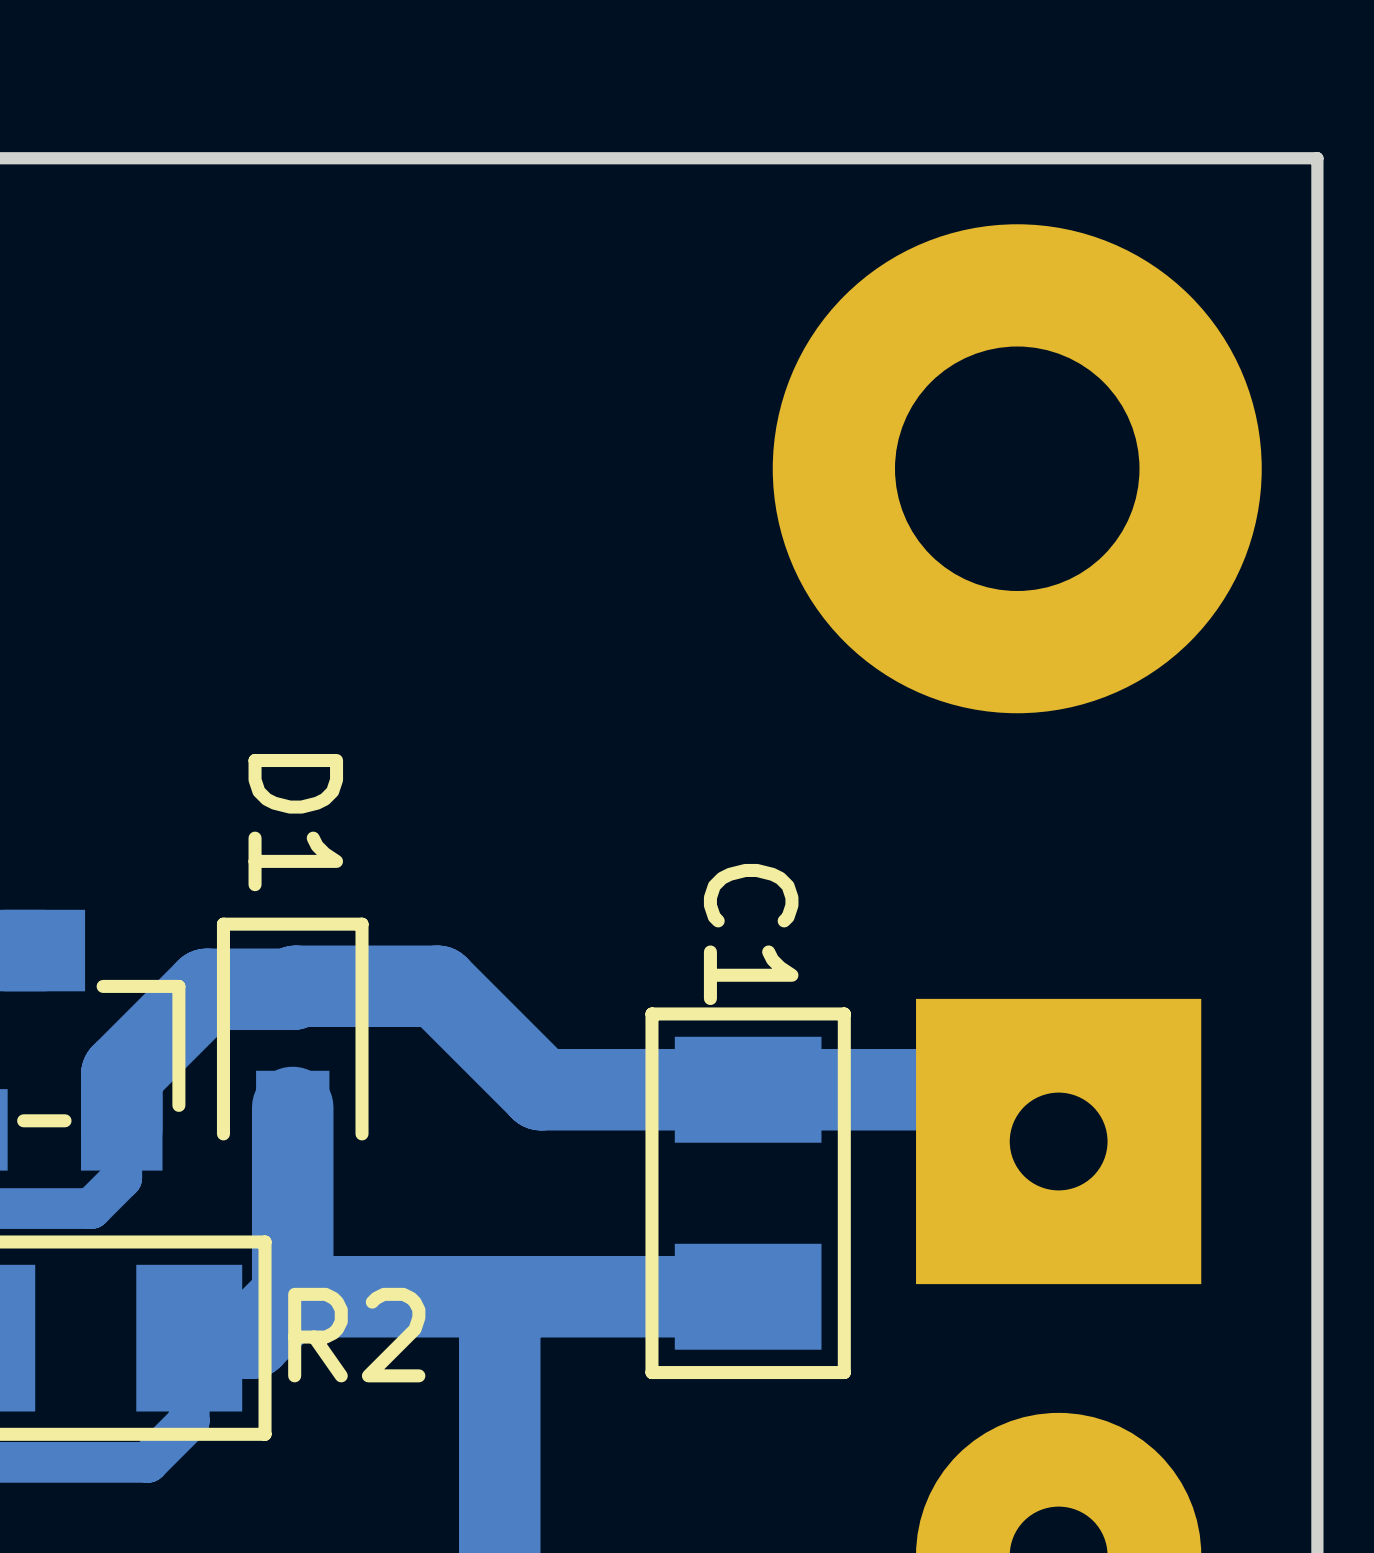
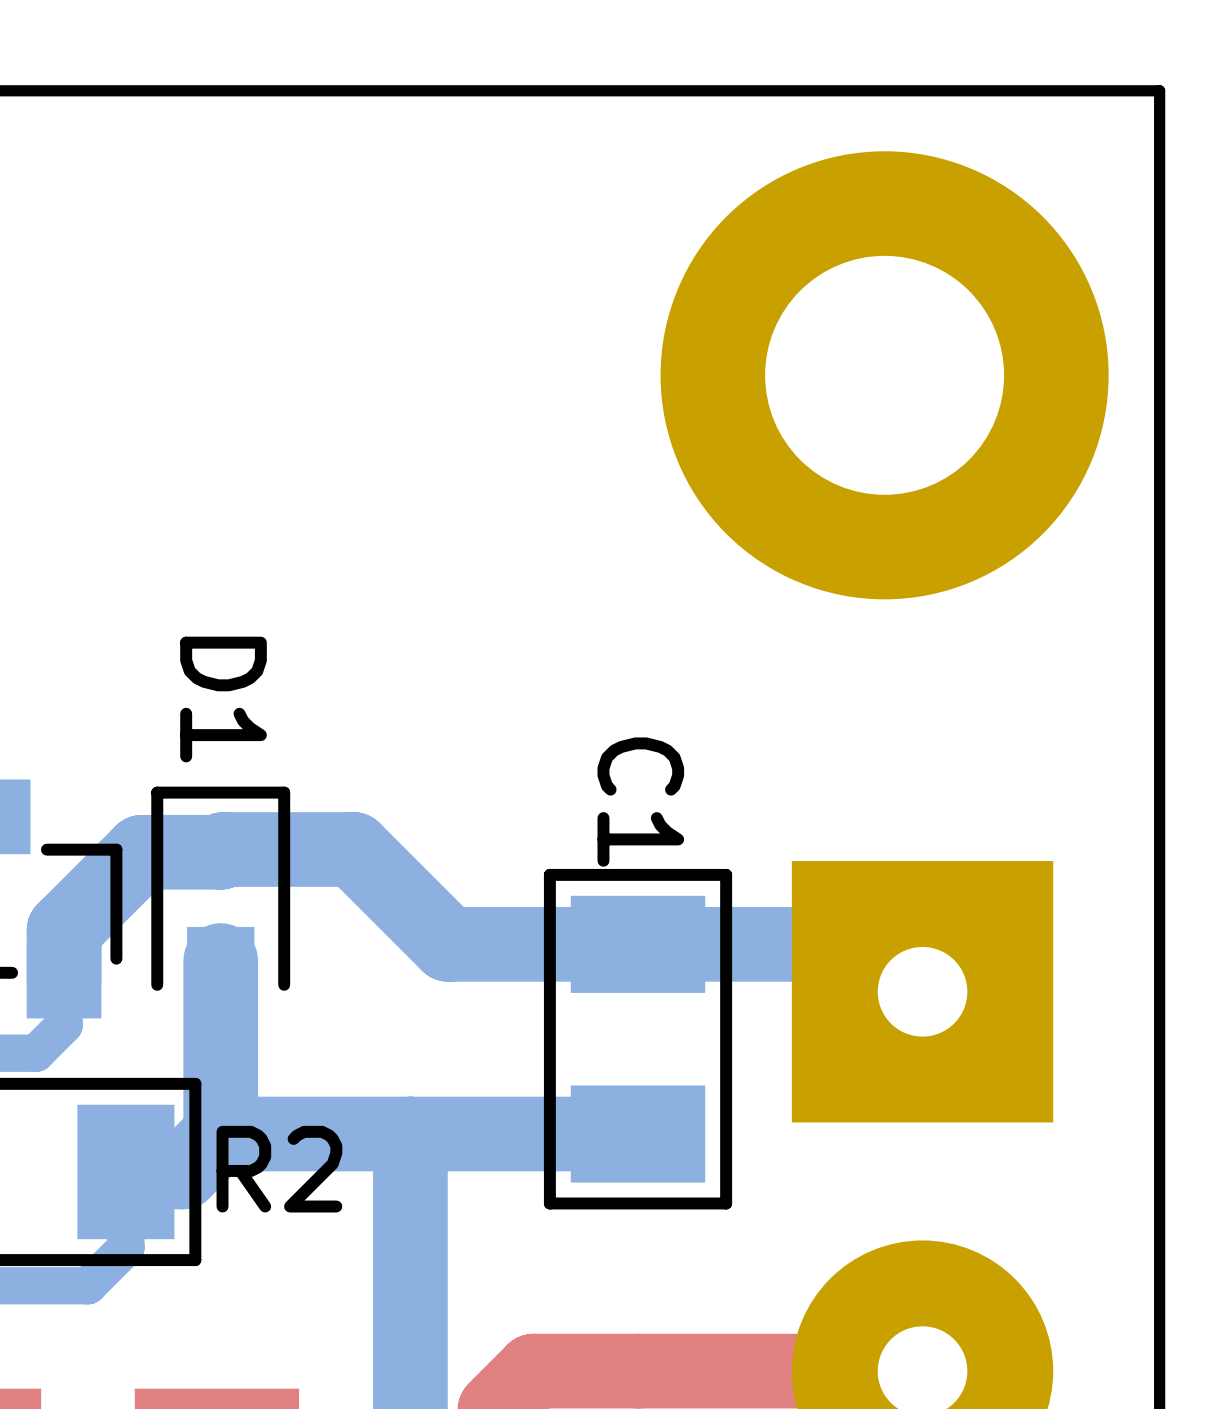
part footprint: [772, 224, 1262, 714] -> [660, 151, 1109, 600]

